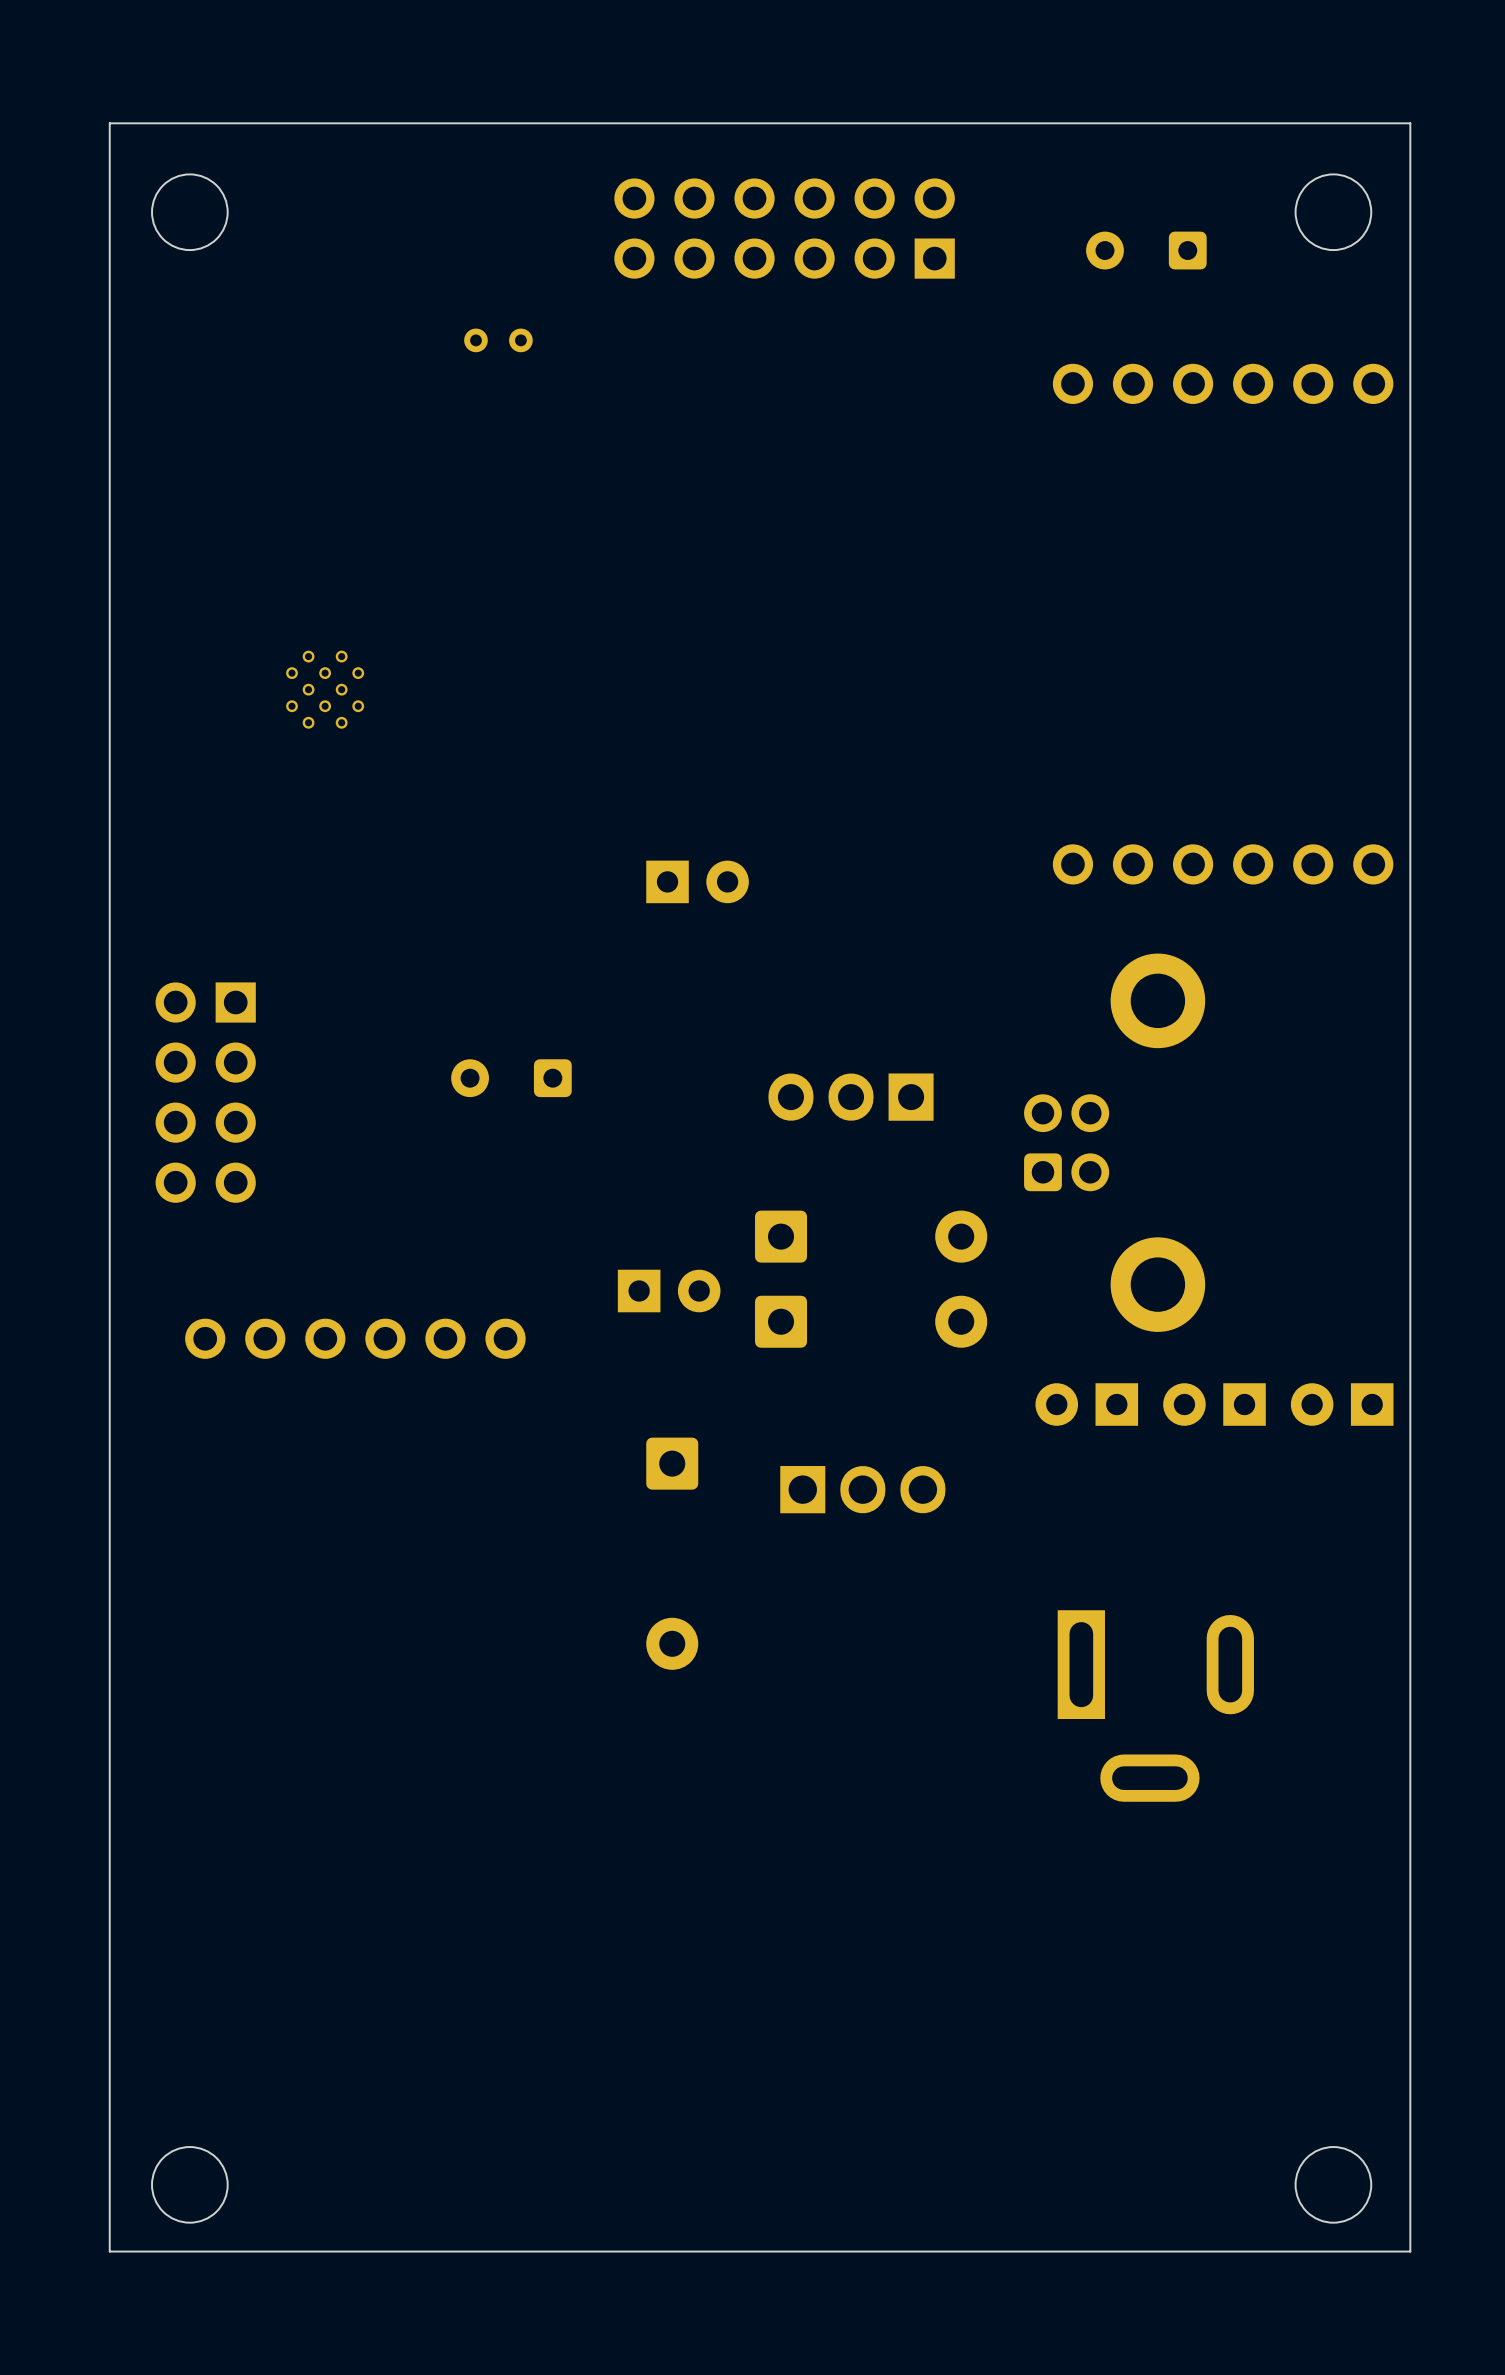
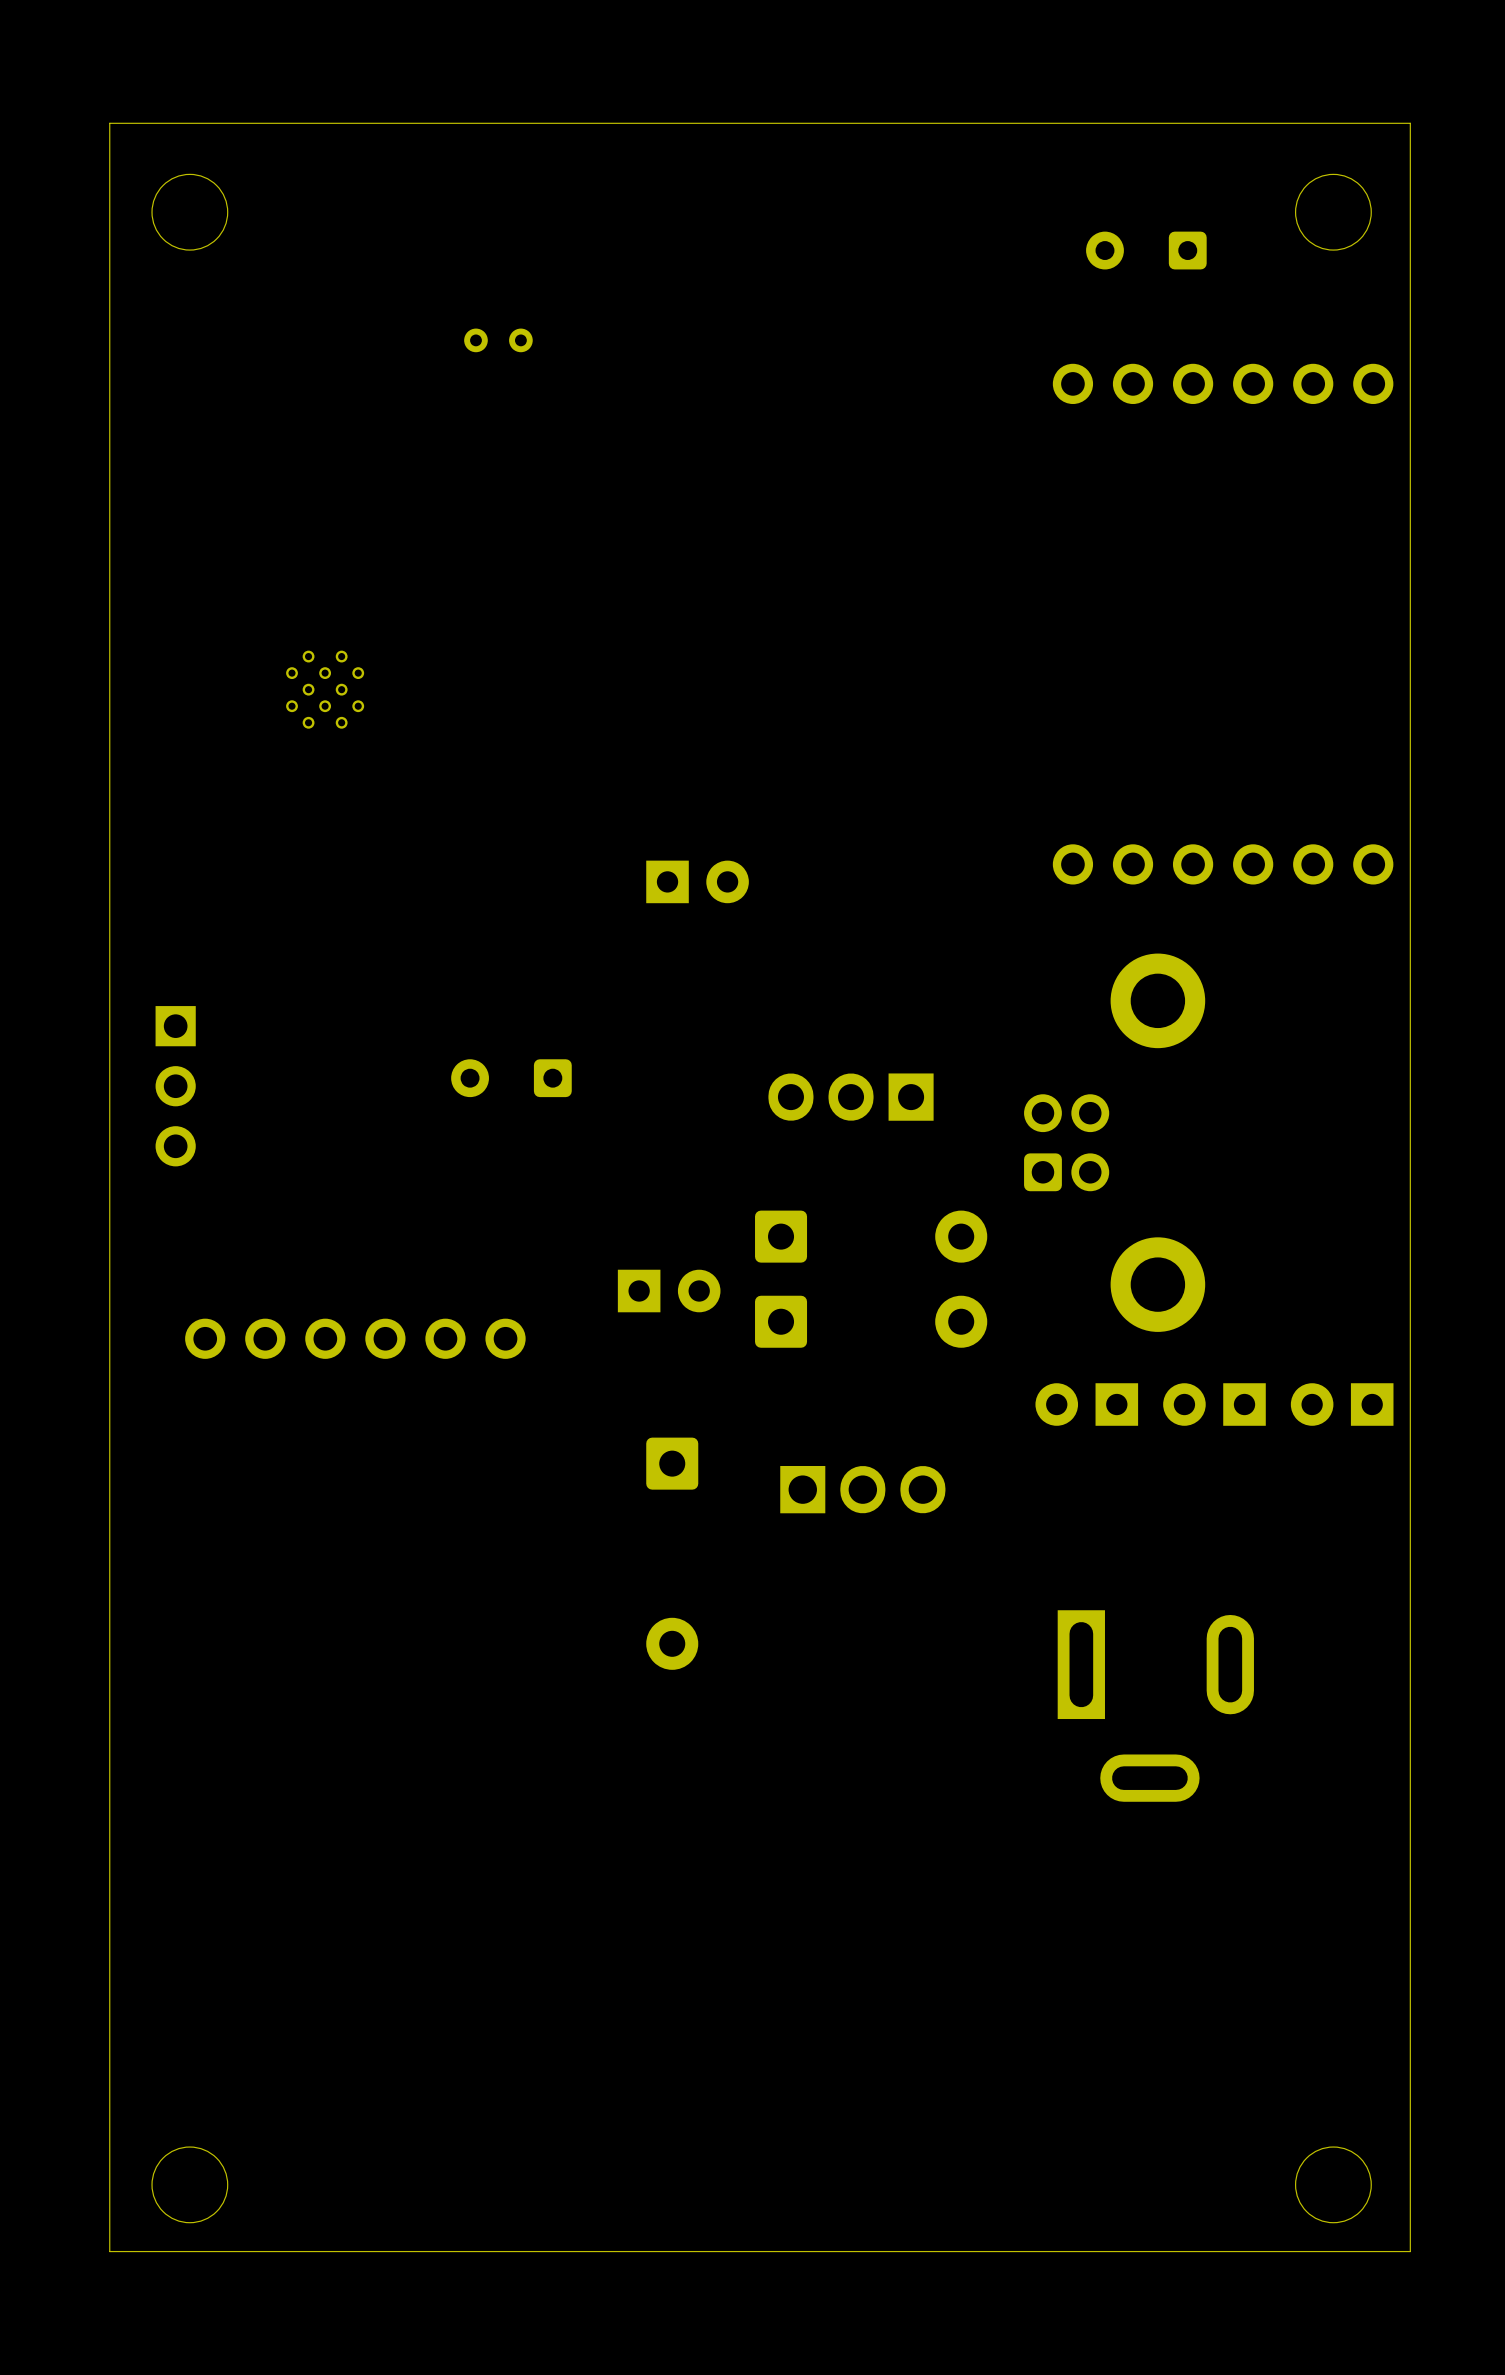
part: (784, 228) -> none
part: none -> (175, 1086)
part: (205, 1092) -> none

